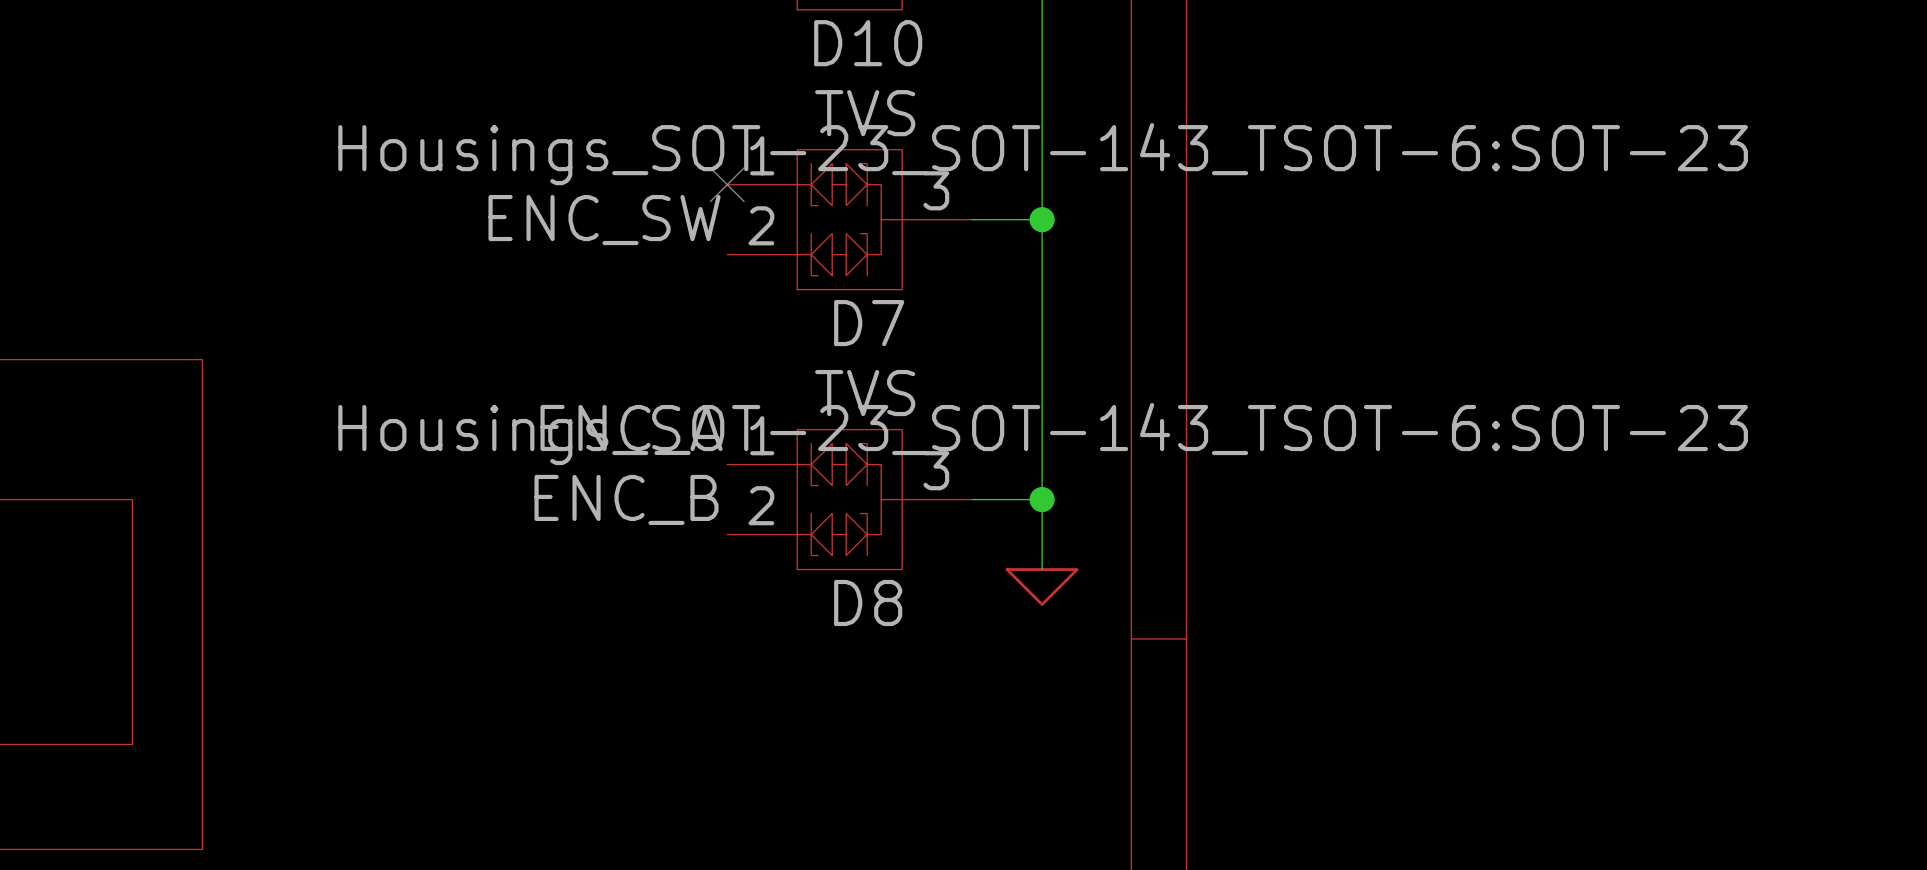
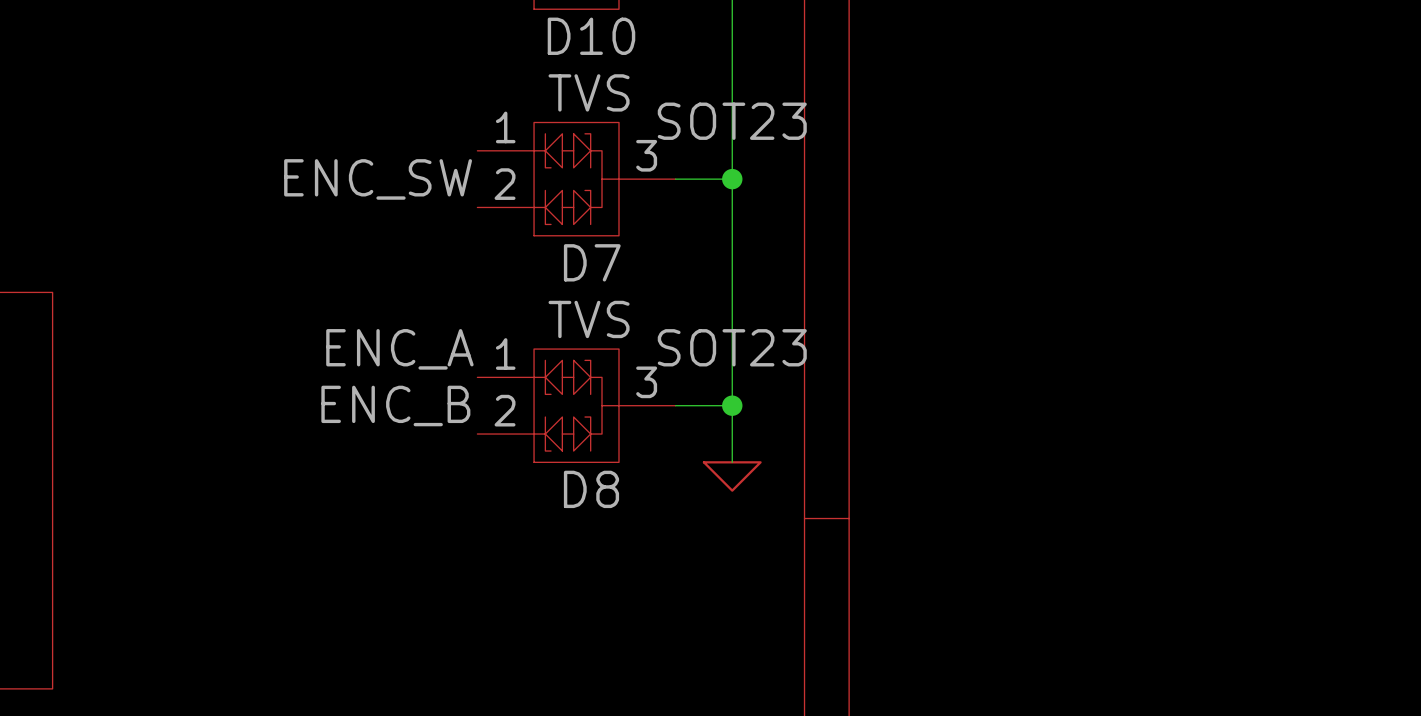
D7 text: Housings_SOT-23_SOT-143_TSOT-6:SOT-23 (1043, 154) -> SOT23 (732, 121)
no-connect mark: (727, 184) -> none
D8 text: Housings_SOT-23_SOT-143_TSOT-6:SOT-23 (1043, 434) -> SOT23 (732, 347)

